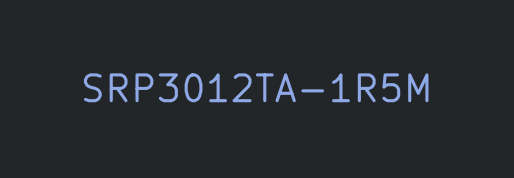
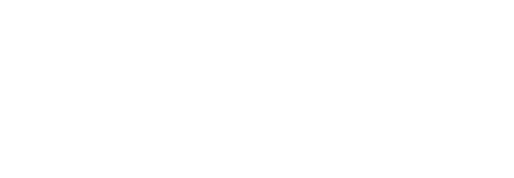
text: SRP3012TA-1R5M (256, 87) -> none

